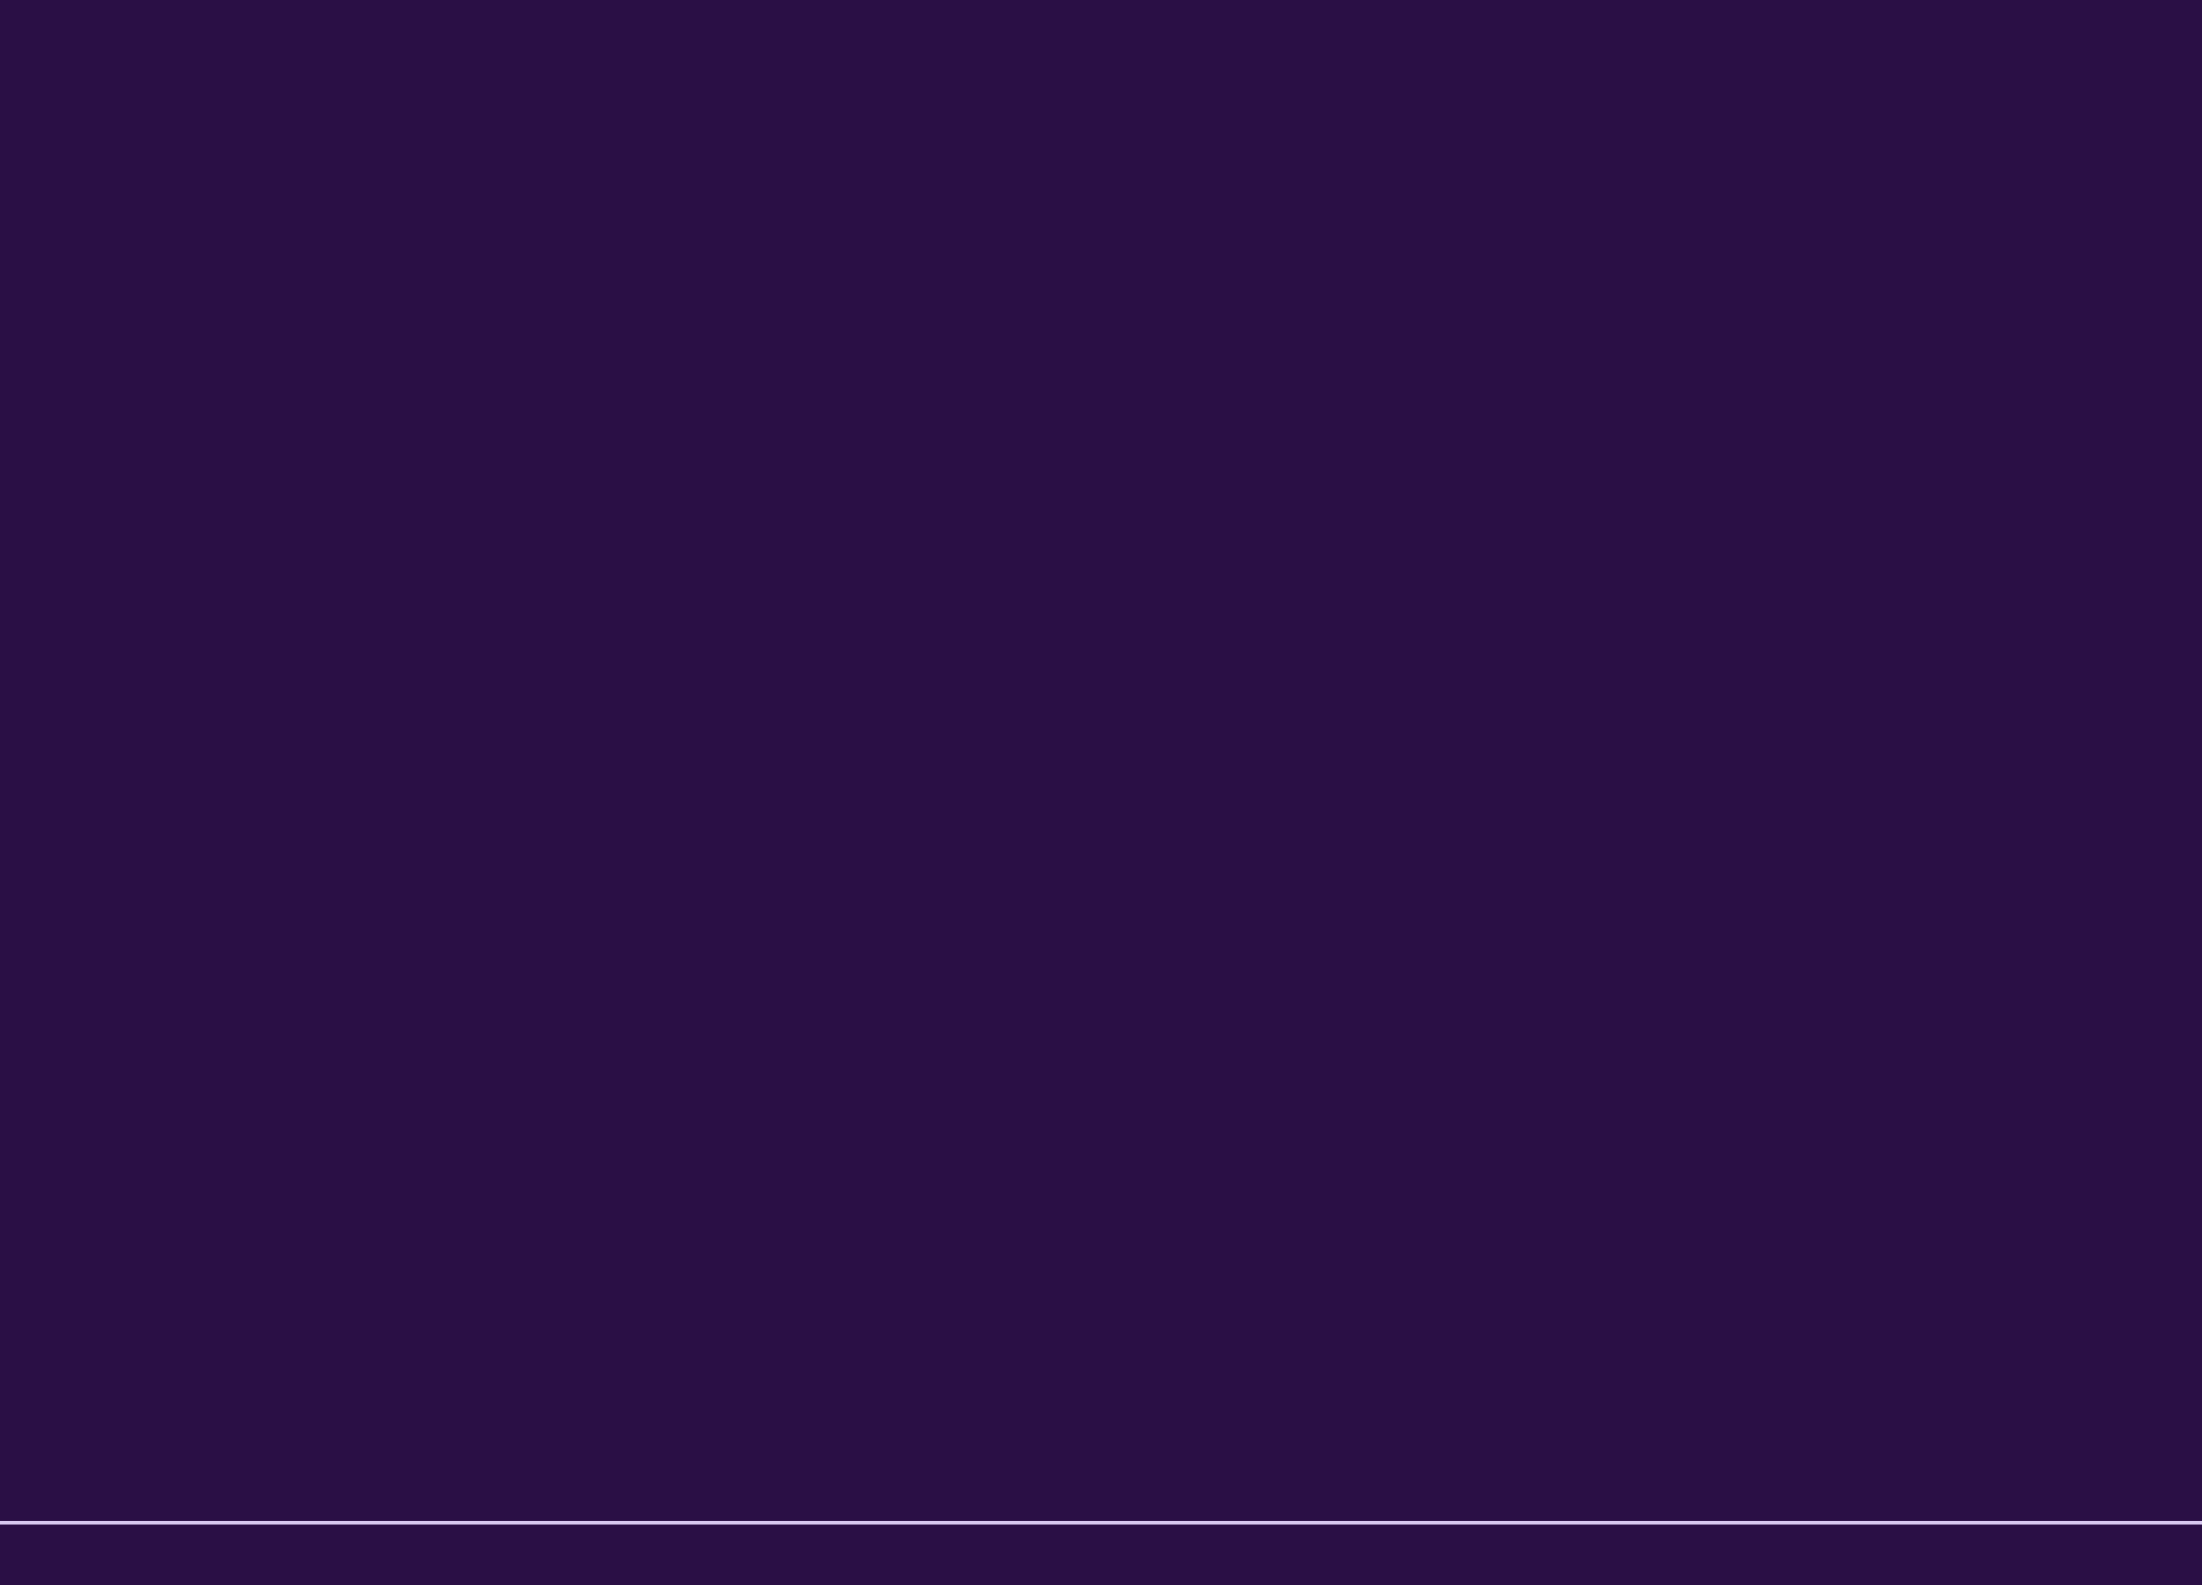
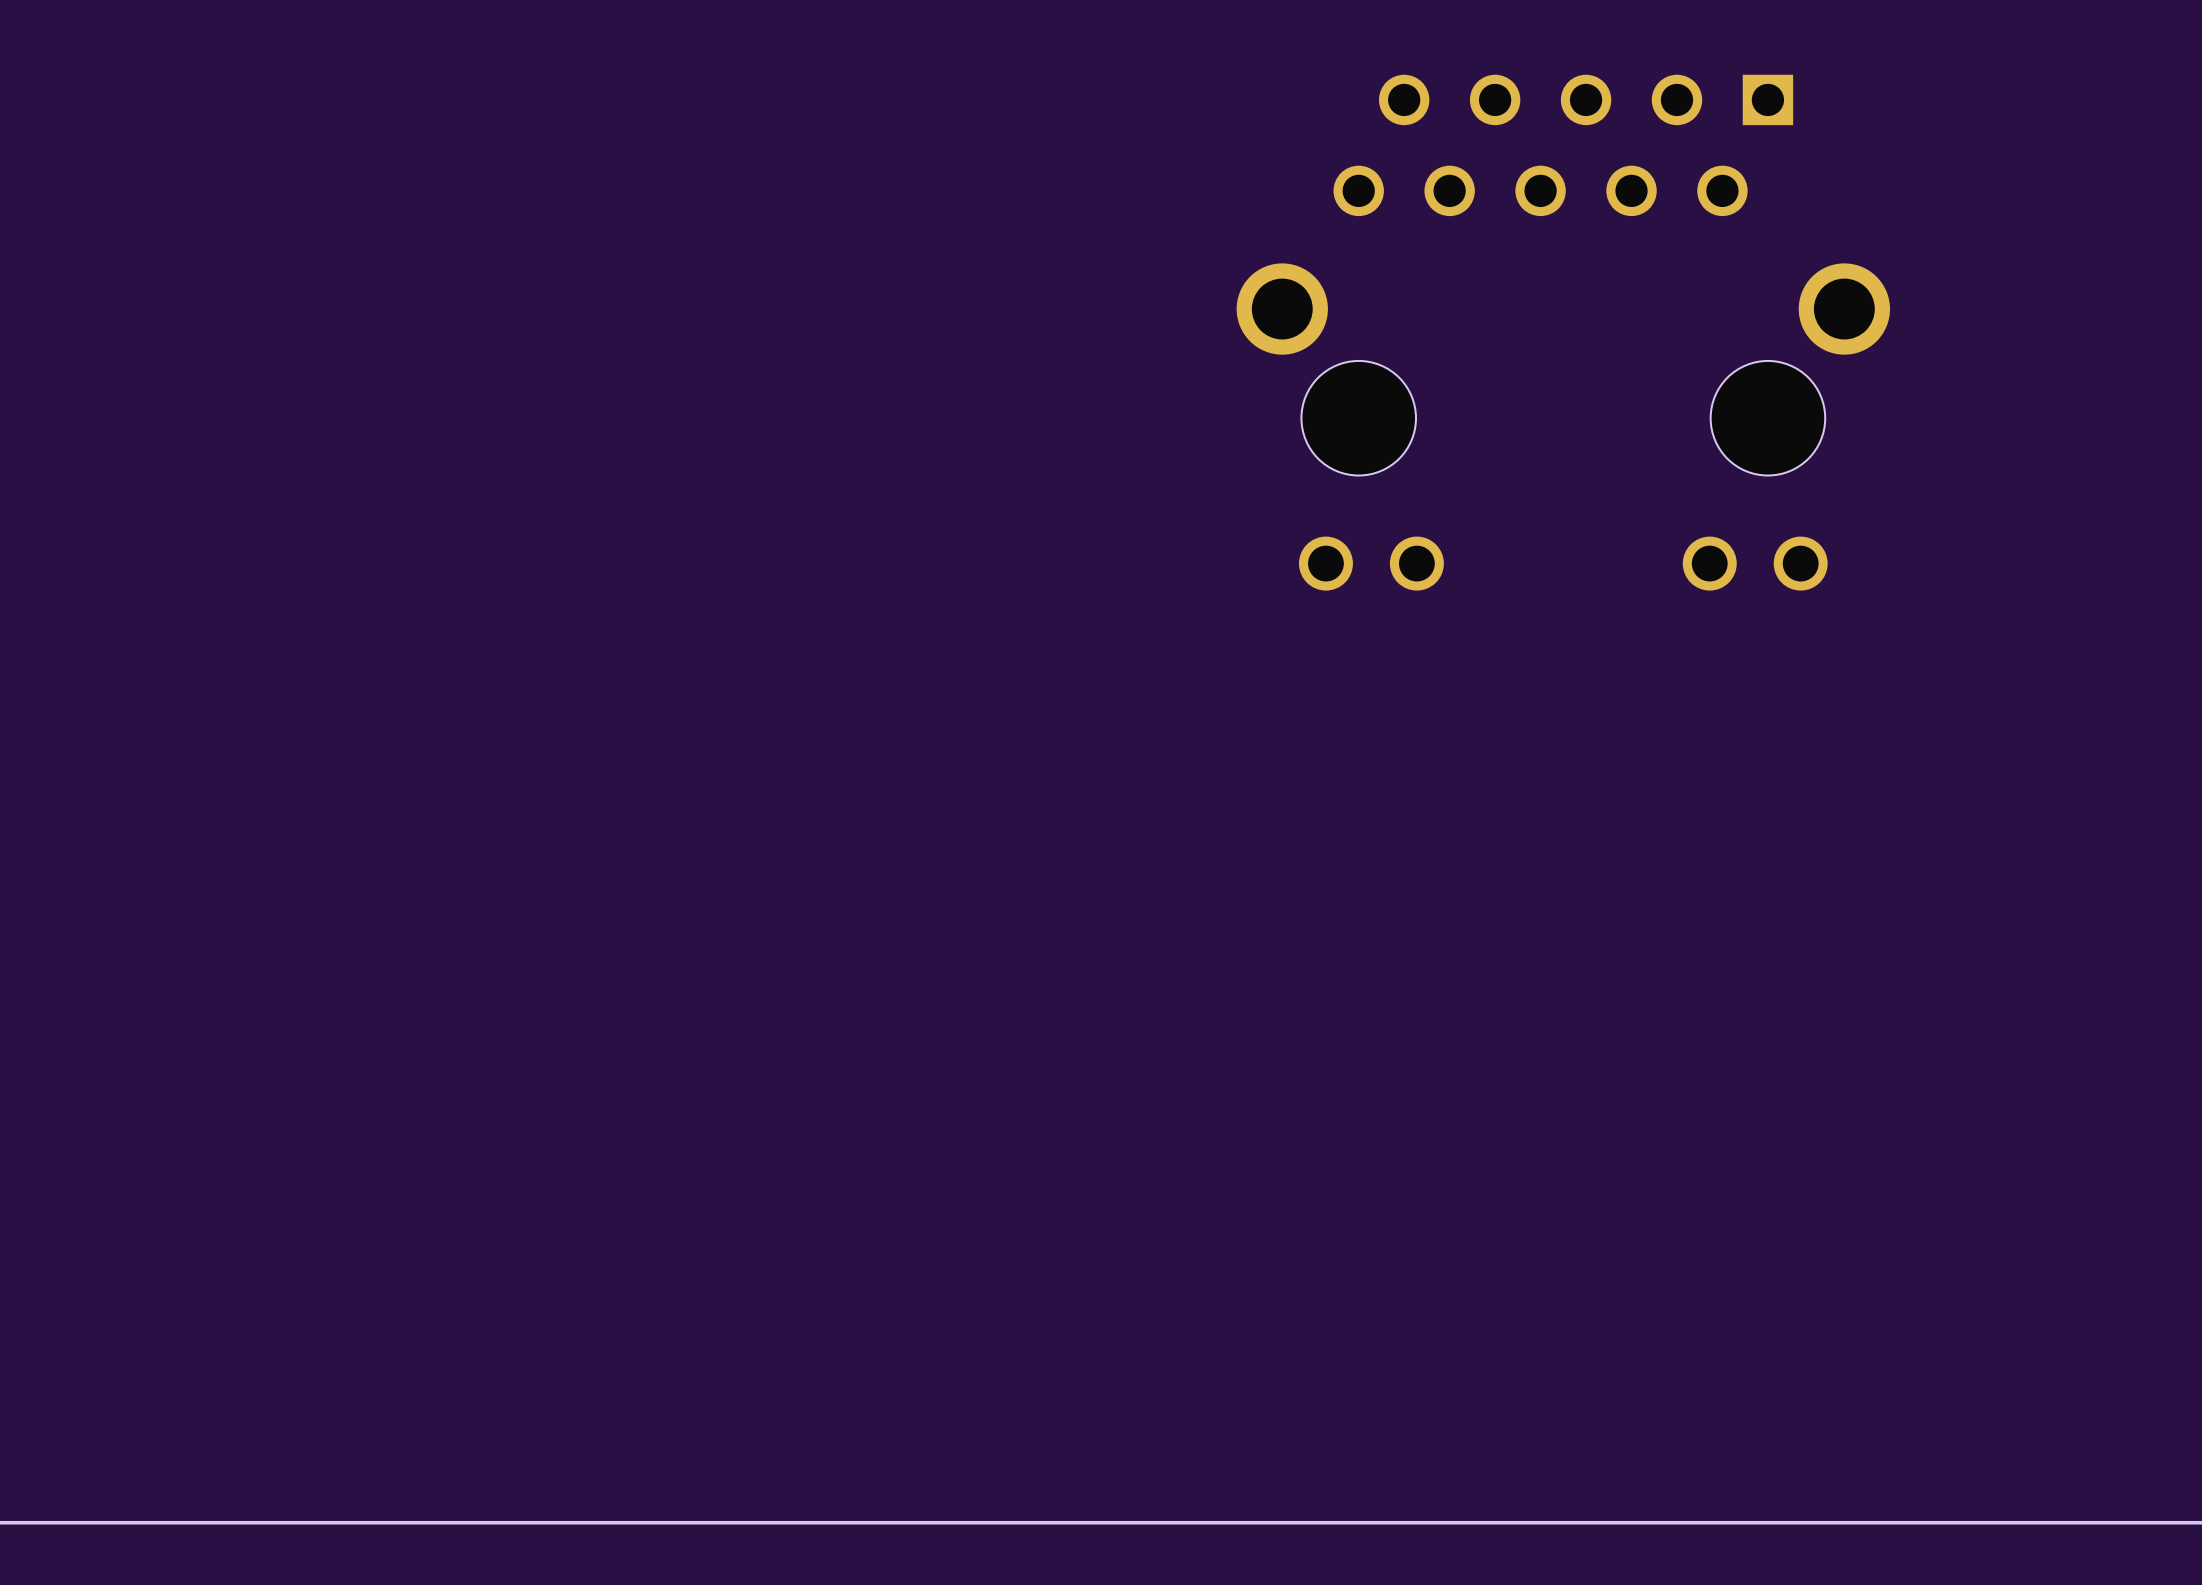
part: none -> (1563, 332)

